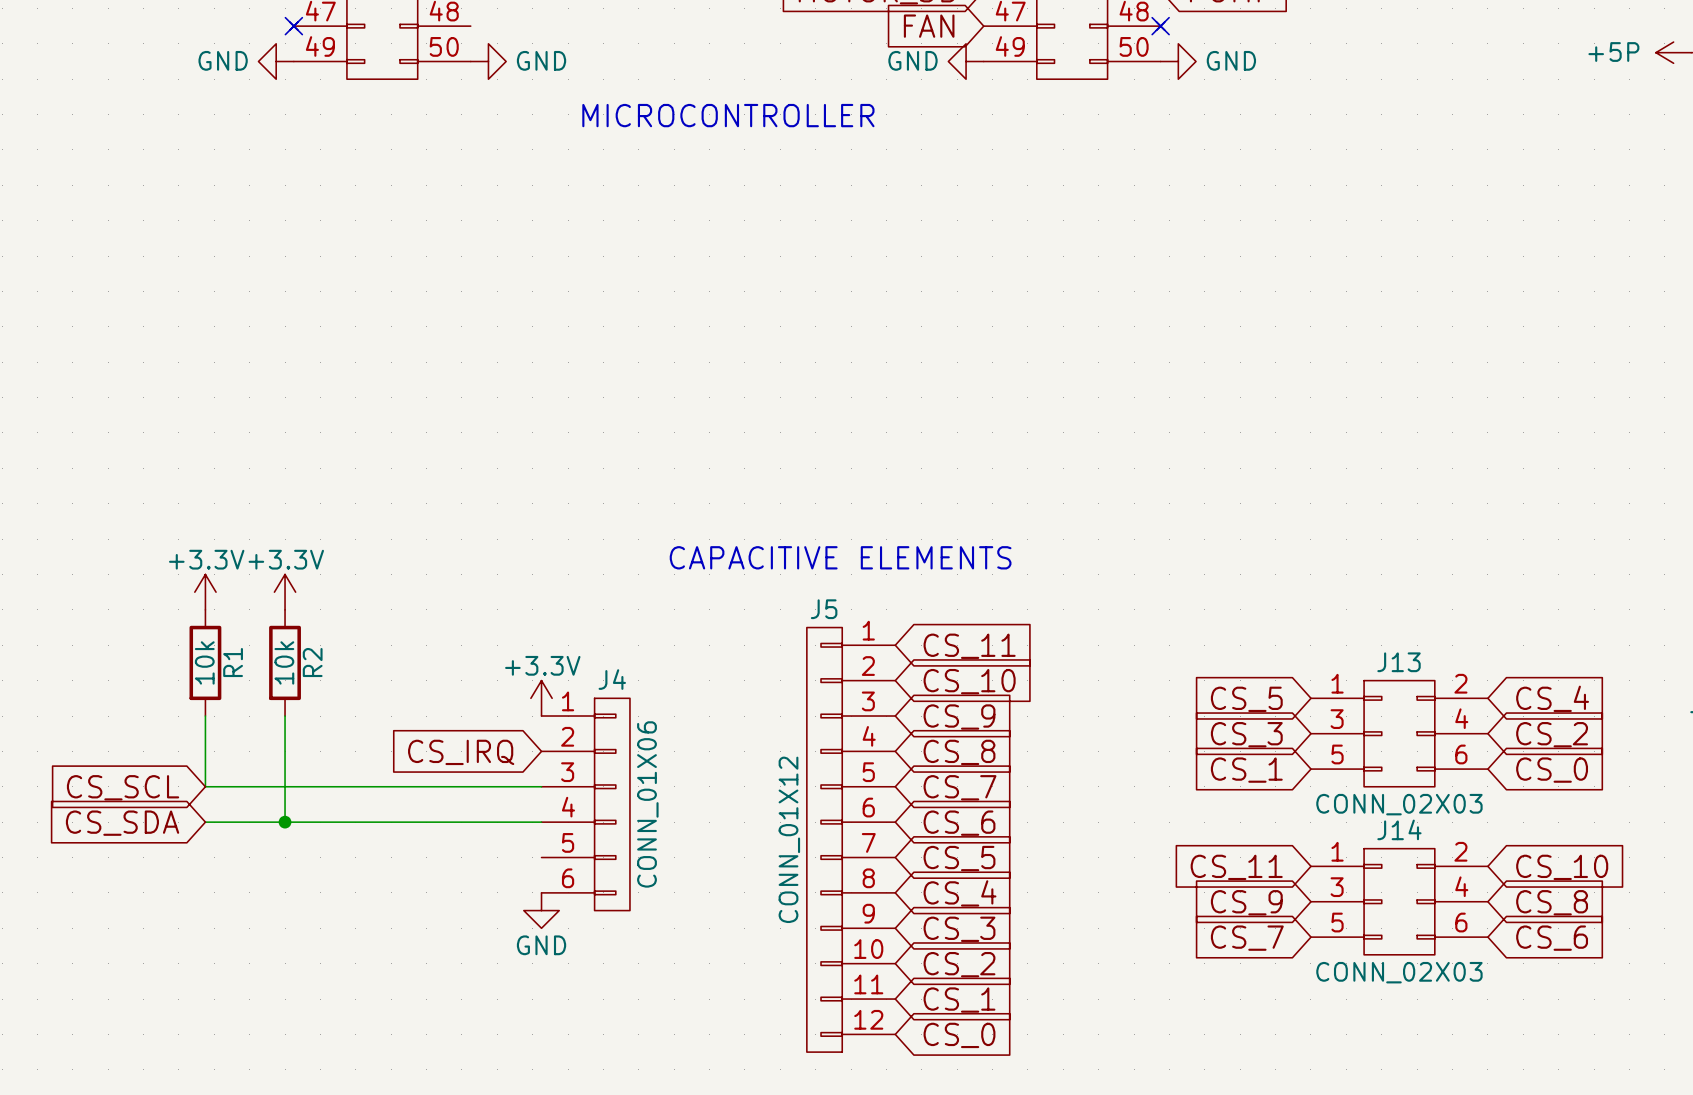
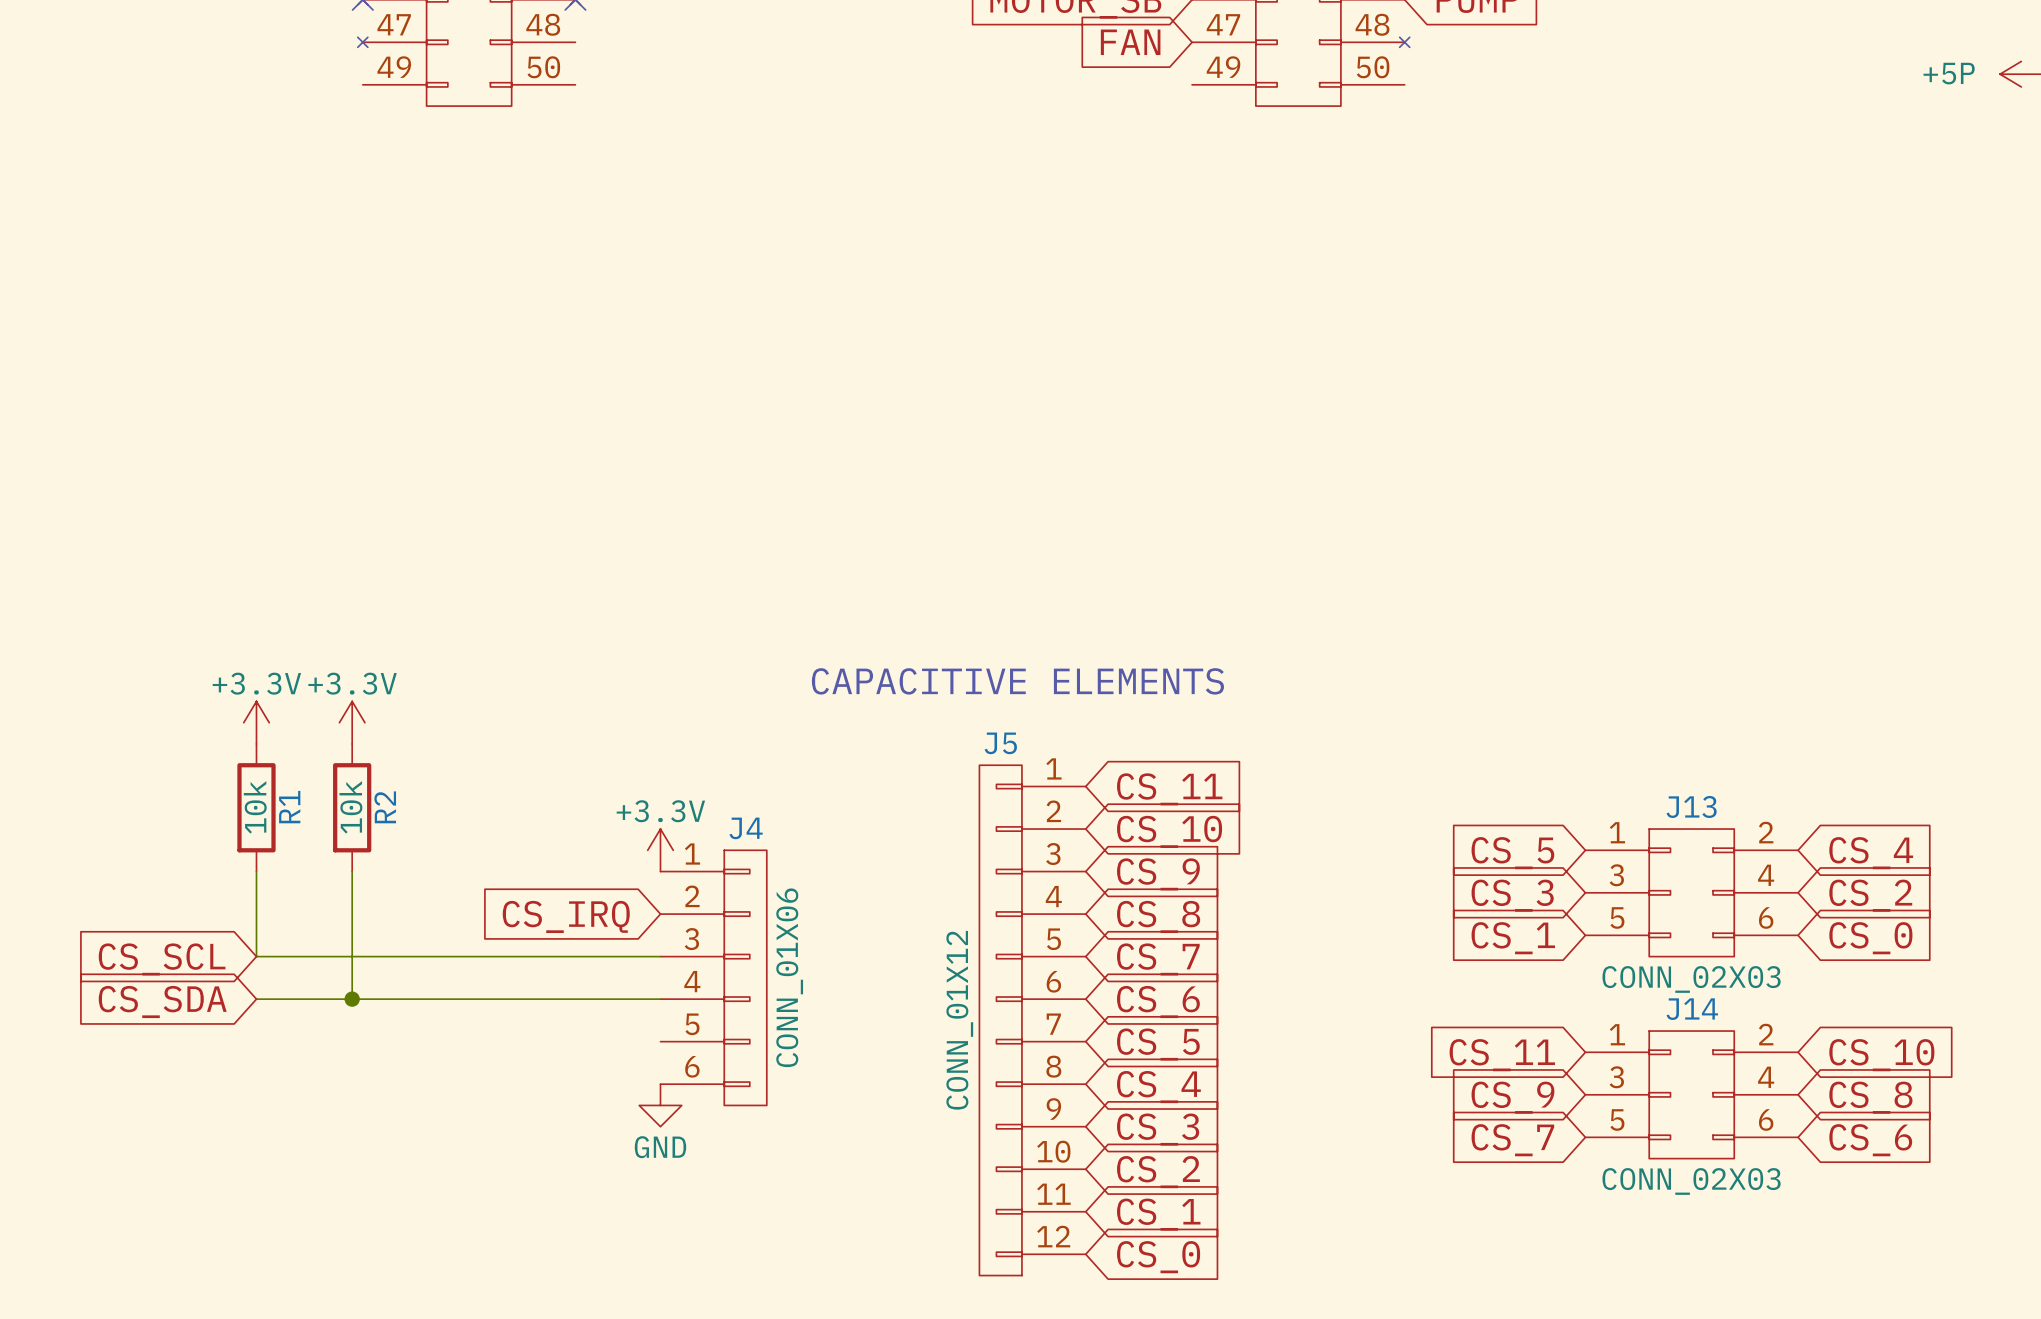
no-connect mark: (293, 26) -> none
no-connect mark: (1160, 26) -> none
power symbol: GND (276, 61) -> none
power symbol: GND (488, 61) -> none
power symbol: GND (966, 61) -> none
power symbol: GND (1178, 61) -> none
text: MICROCONTROLLER (728, 115) -> none

